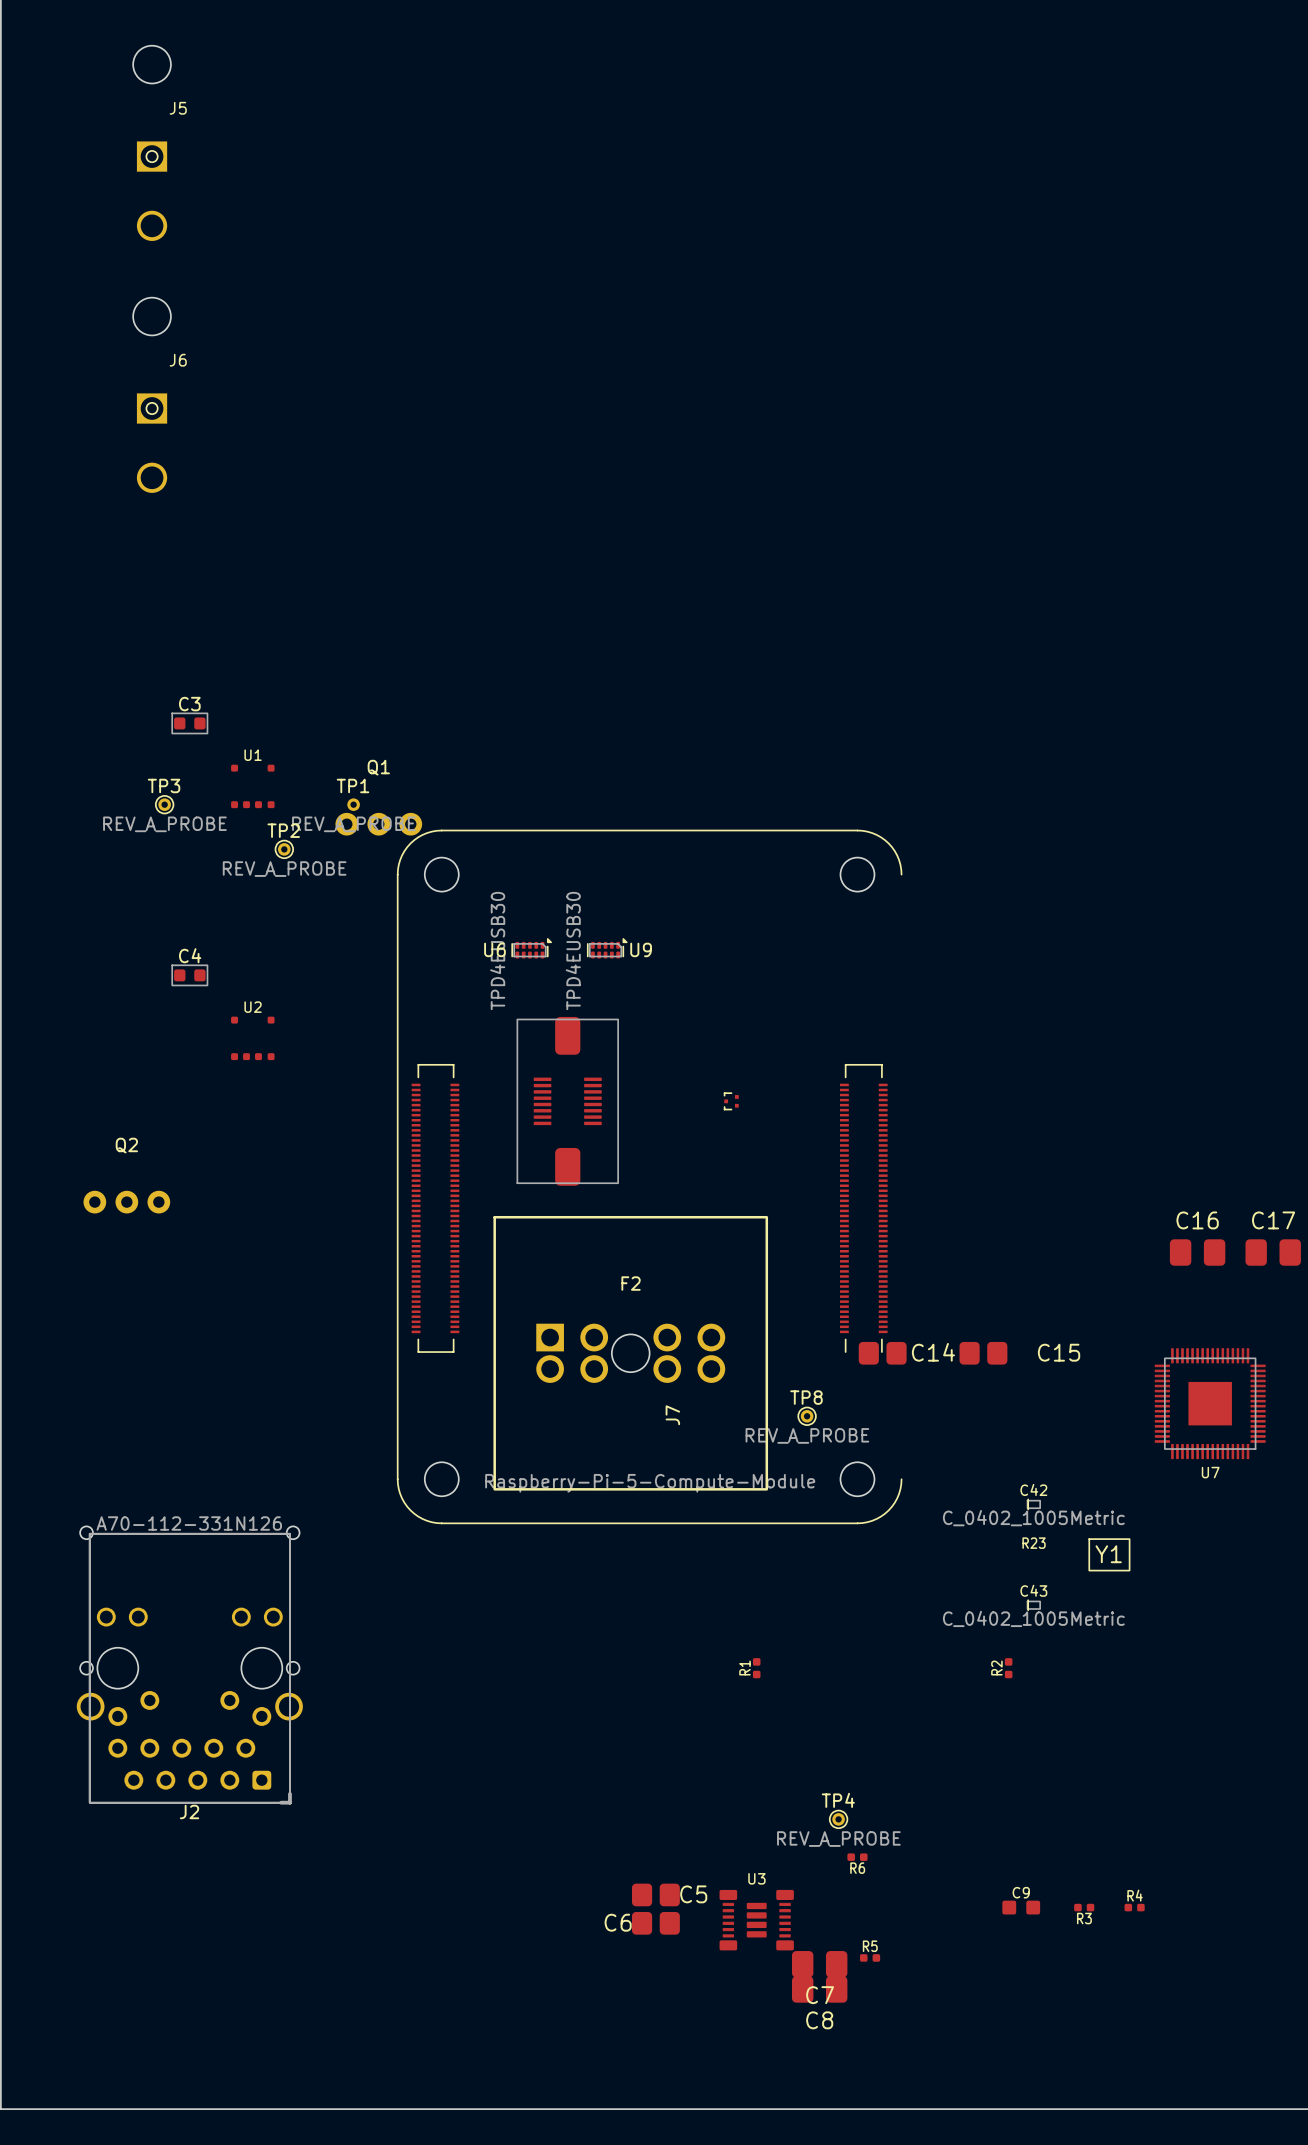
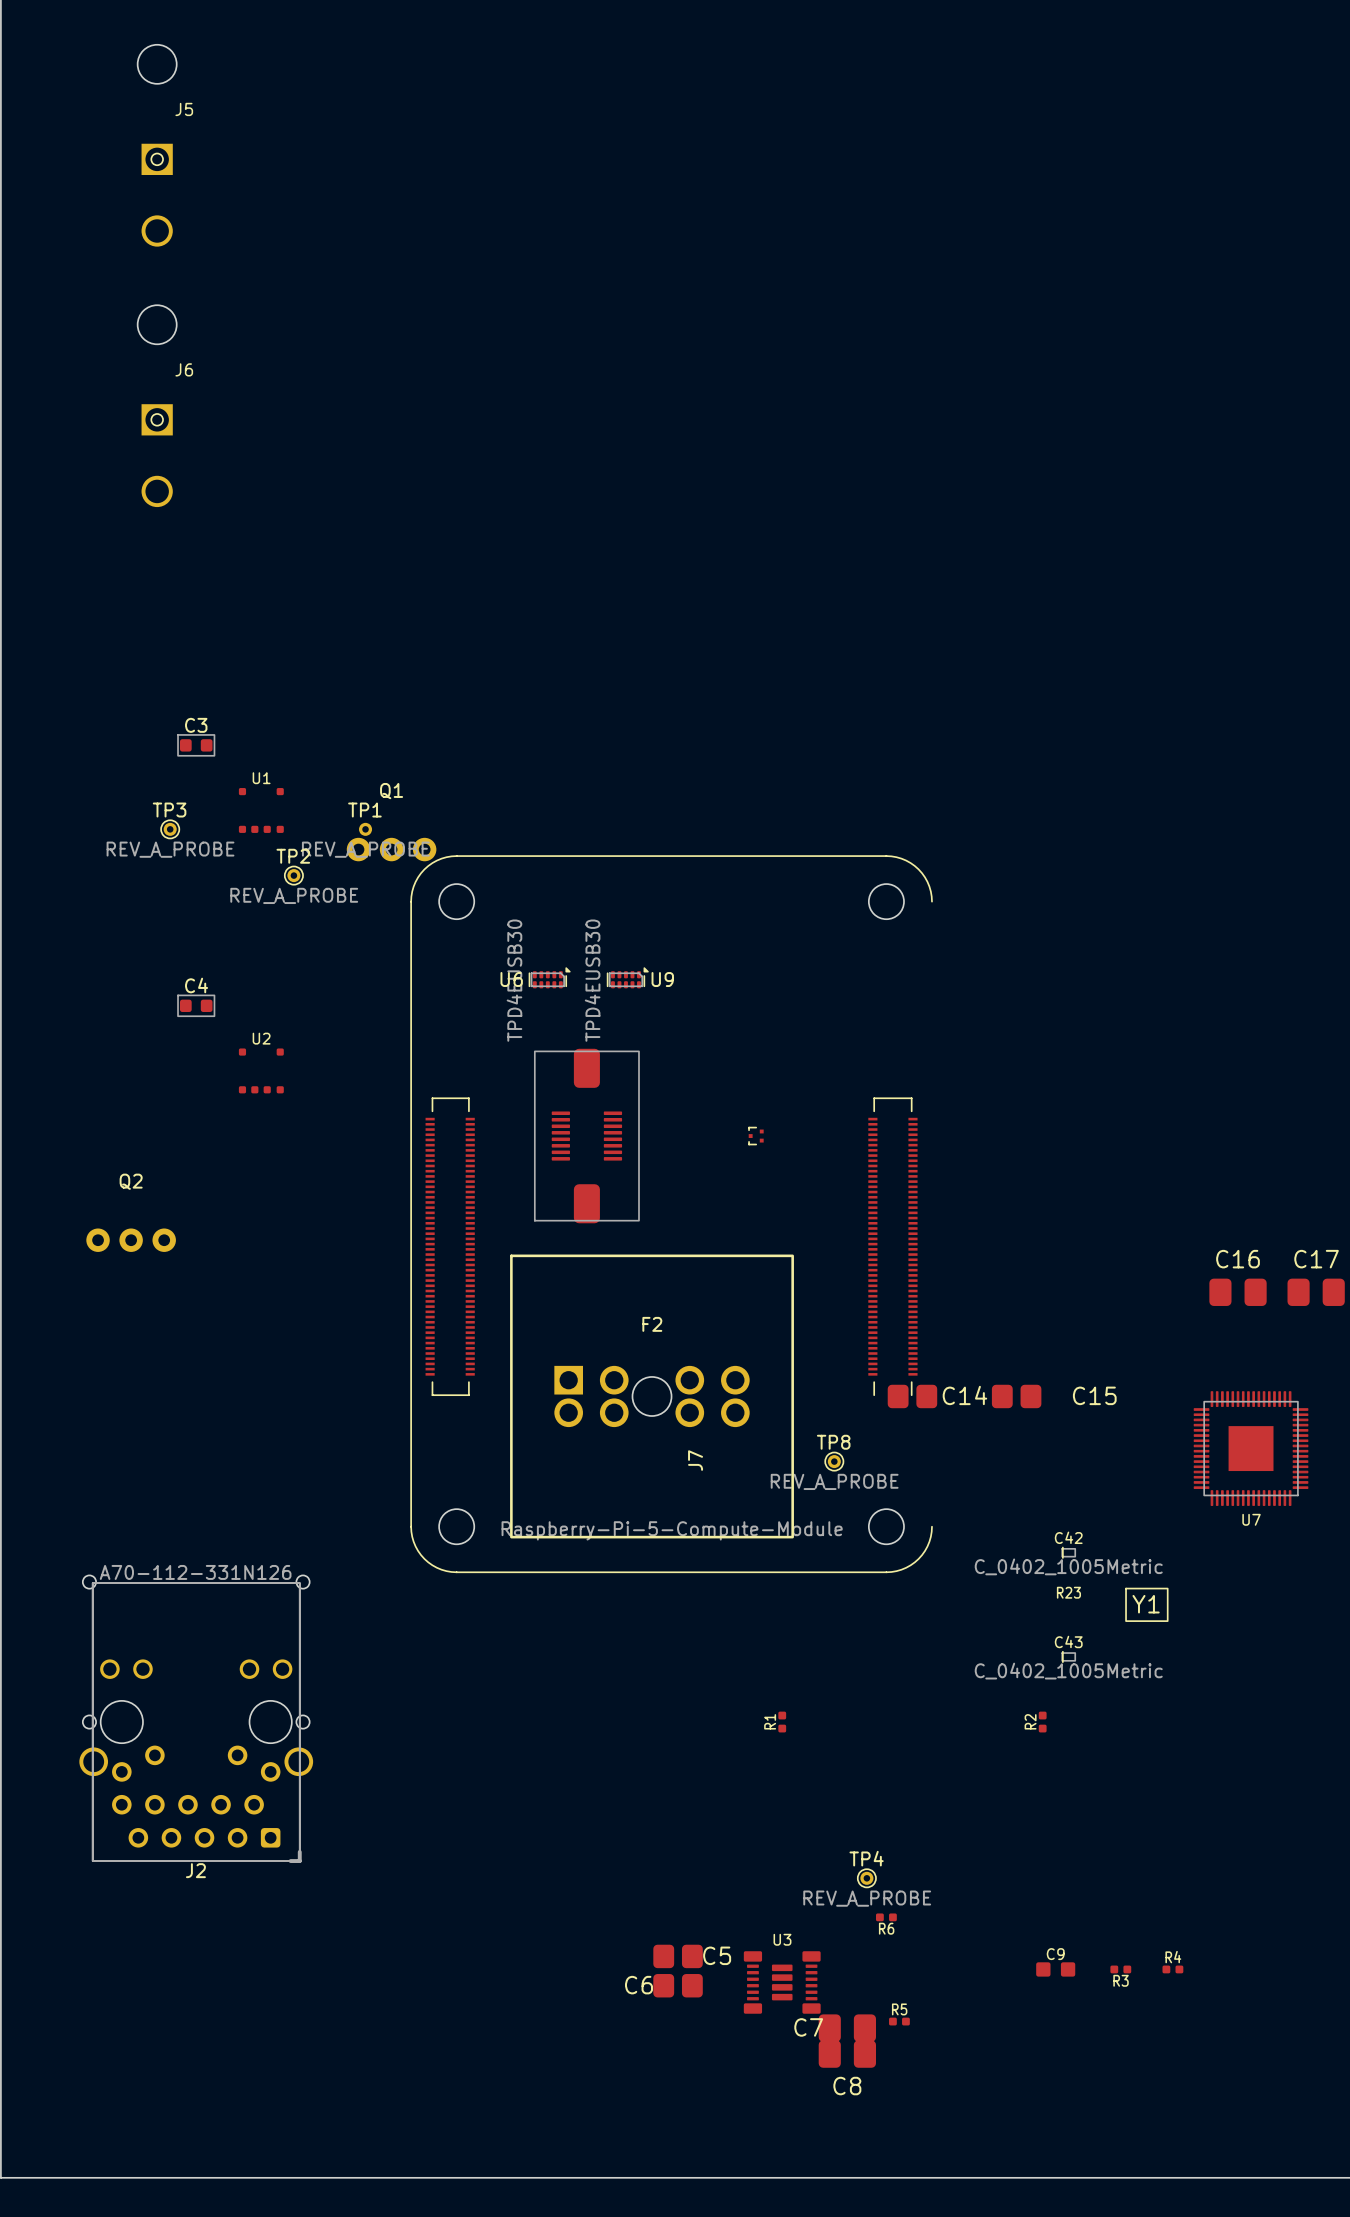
C7 name position: C7 (820, 1995) -> C7 (808, 2027)

